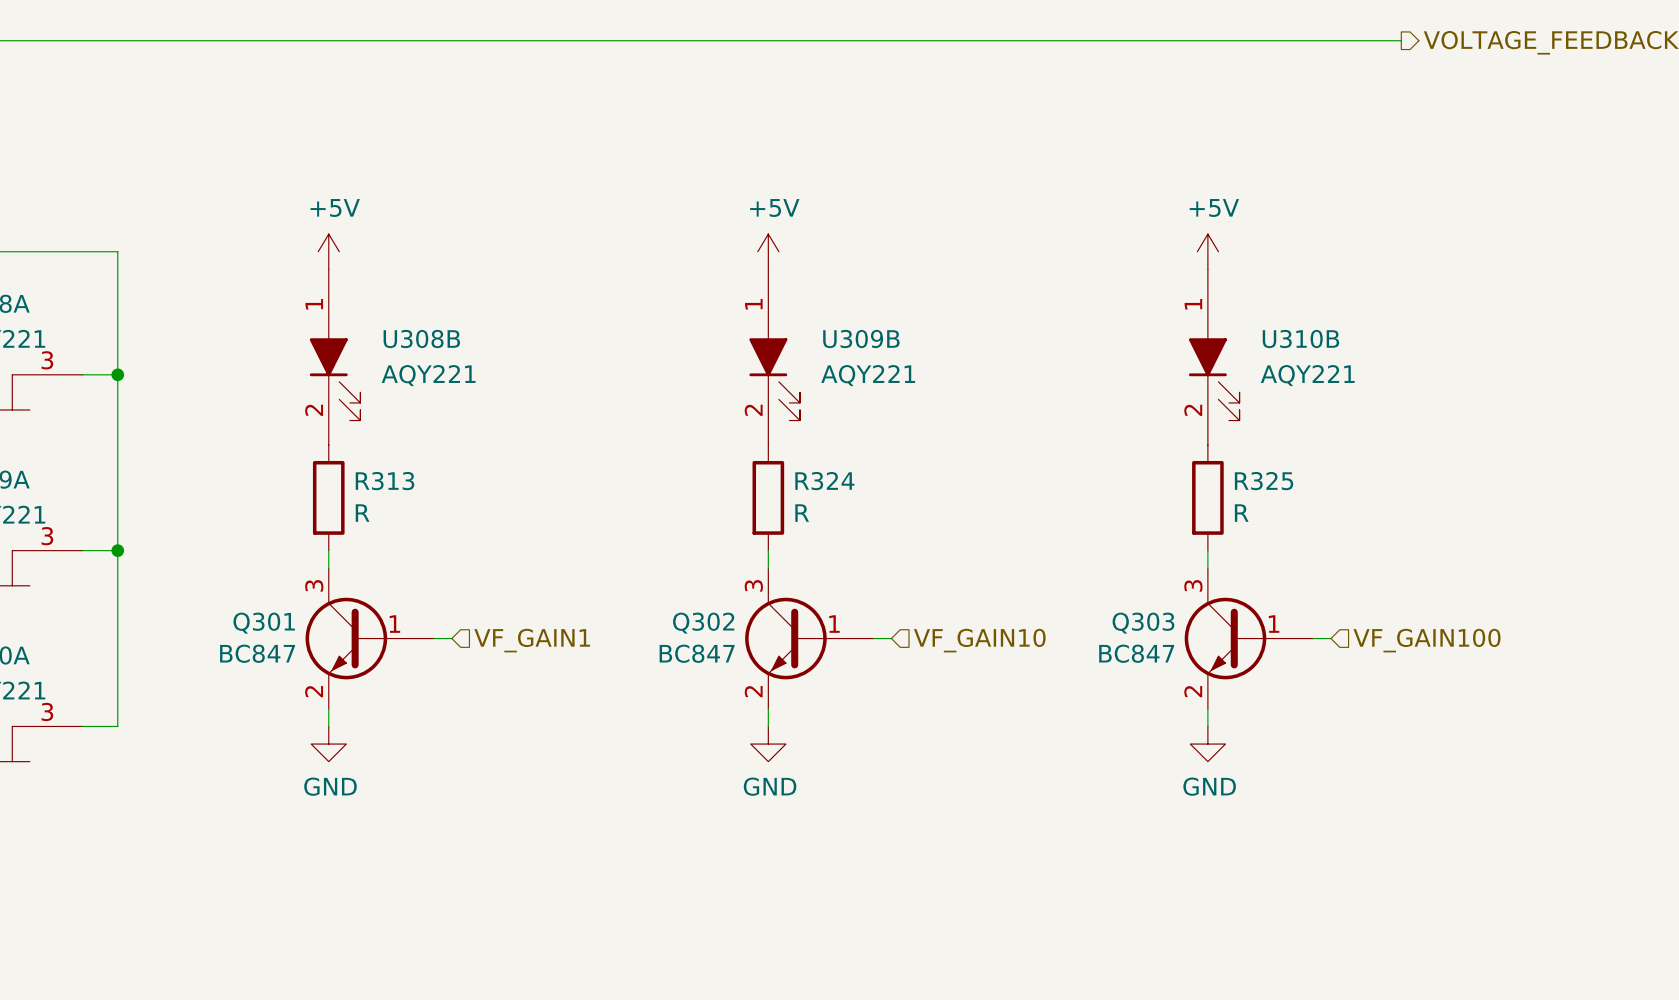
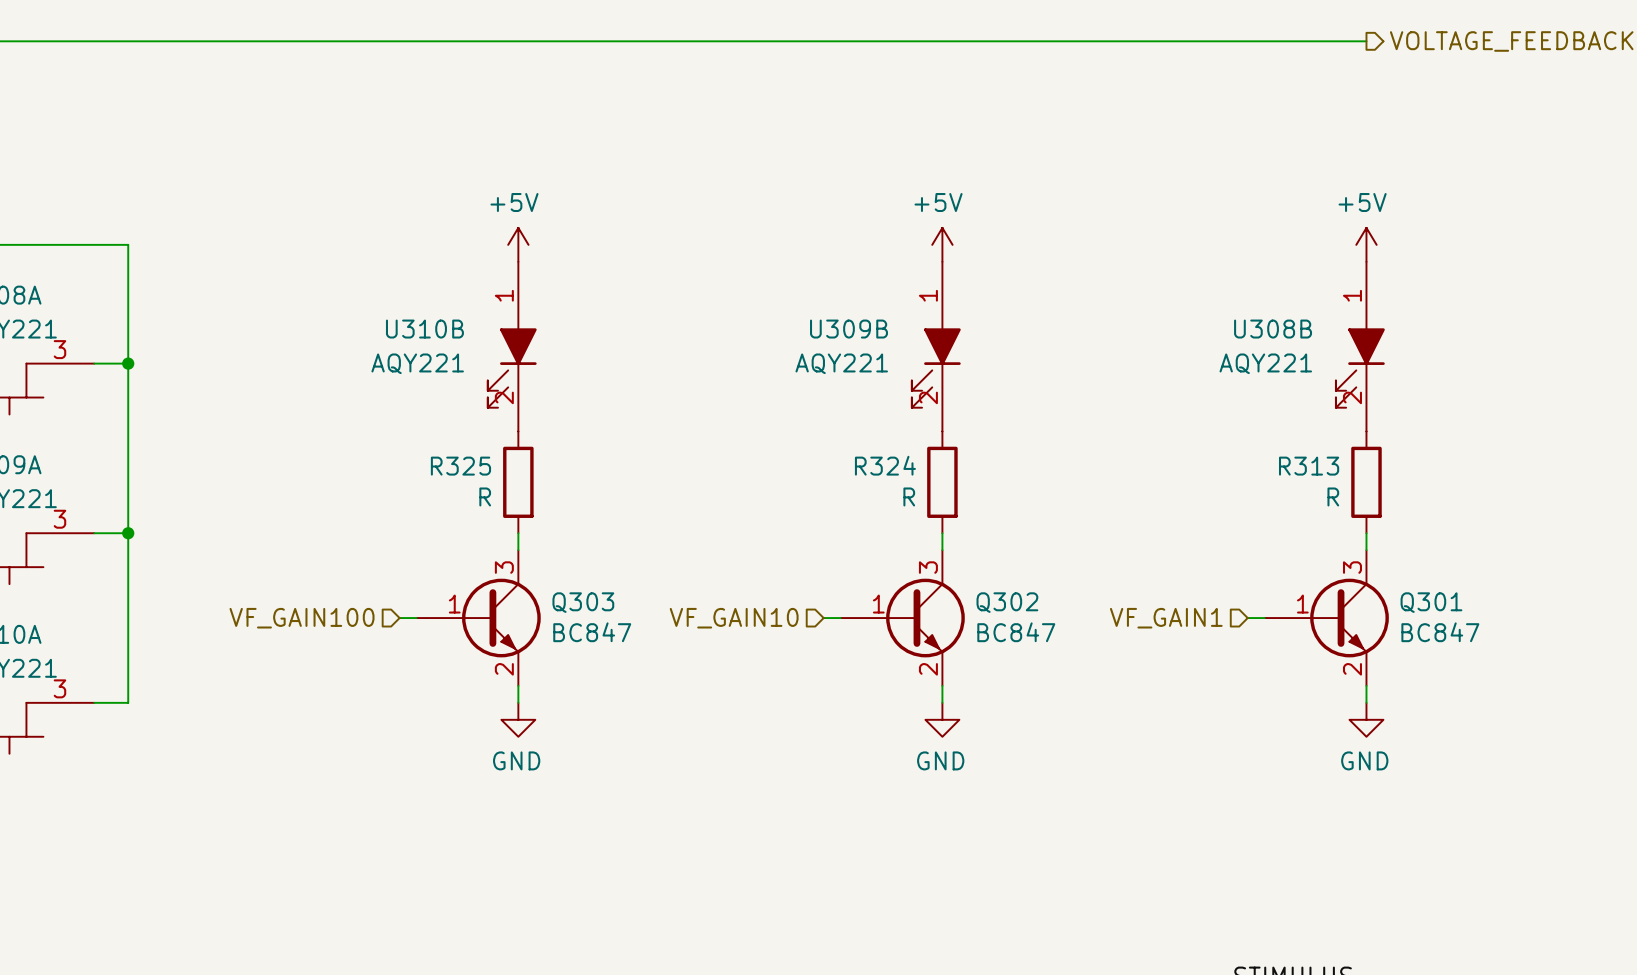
power symbol: +5V (328, 251) -> none
power symbol: none -> +5V (518, 244)
power symbol: +5V (768, 251) -> none
power symbol: none -> +5V (942, 244)
power symbol: +5V (1207, 251) -> none
power symbol: none -> +5V (1366, 244)
U308B position: (335, 357) -> (1360, 346)
U309B position: (774, 357) -> (936, 346)
U310B position: (1214, 357) -> (512, 346)
U308B flip: as is (335, 379) -> left-right (1360, 368)
U309B flip: as is (774, 379) -> left-right (936, 368)
U310B flip: as is (1214, 379) -> left-right (512, 368)
R313 name position: R313 (384, 481) -> R313 (1309, 466)
R324 name position: R324 (824, 481) -> R324 (885, 465)
R325 name position: R325 (1264, 481) -> R325 (460, 466)
R313 position: (328, 497) -> (1366, 482)
R324 position: (768, 497) -> (942, 482)
R325 position: (1207, 497) -> (518, 482)
R313 value position: R (362, 513) -> R (1333, 496)
R324 value position: R (802, 513) -> R (909, 496)
R325 value position: R (1241, 513) -> R (485, 496)
wire: (328, 550) (328, 568) -> (518, 533) (518, 550)
wire: (768, 550) (768, 568) -> (942, 533) (942, 550)
wire: (1207, 550) (1207, 568) -> (1366, 533) (1366, 550)
Q301 flip: as is (346, 638) -> left-right (1349, 618)
Q301 position: (369, 638) -> (1326, 618)
Q302 flip: as is (785, 638) -> left-right (925, 618)
Q302 position: (809, 638) -> (902, 618)
Q303 flip: as is (1225, 638) -> left-right (501, 618)
Q303 position: (1249, 638) -> (478, 618)
hierarchical label: none -> VF_GAIN100 (302, 618)
hierarchical label: VF_GAIN1 (532, 640) -> none
hierarchical label rotation: 0° (979, 640) -> 180° (734, 618)
hierarchical label position: VF_GAIN10 (979, 640) -> VF_GAIN10 (734, 618)
hierarchical label: none -> VF_GAIN1 (1166, 618)
hierarchical label: VF_GAIN100 (1427, 640) -> none
wire: (328, 708) (328, 726) -> (518, 685) (518, 702)
wire: (768, 708) (768, 726) -> (942, 685) (942, 702)
wire: (1207, 708) (1207, 726) -> (1366, 685) (1366, 702)
power symbol: GND (328, 744) -> none
power symbol: none -> GND (518, 719)
power symbol: GND (768, 744) -> none
power symbol: none -> GND (942, 719)
power symbol: GND (1207, 744) -> none
power symbol: none -> GND (1366, 719)

